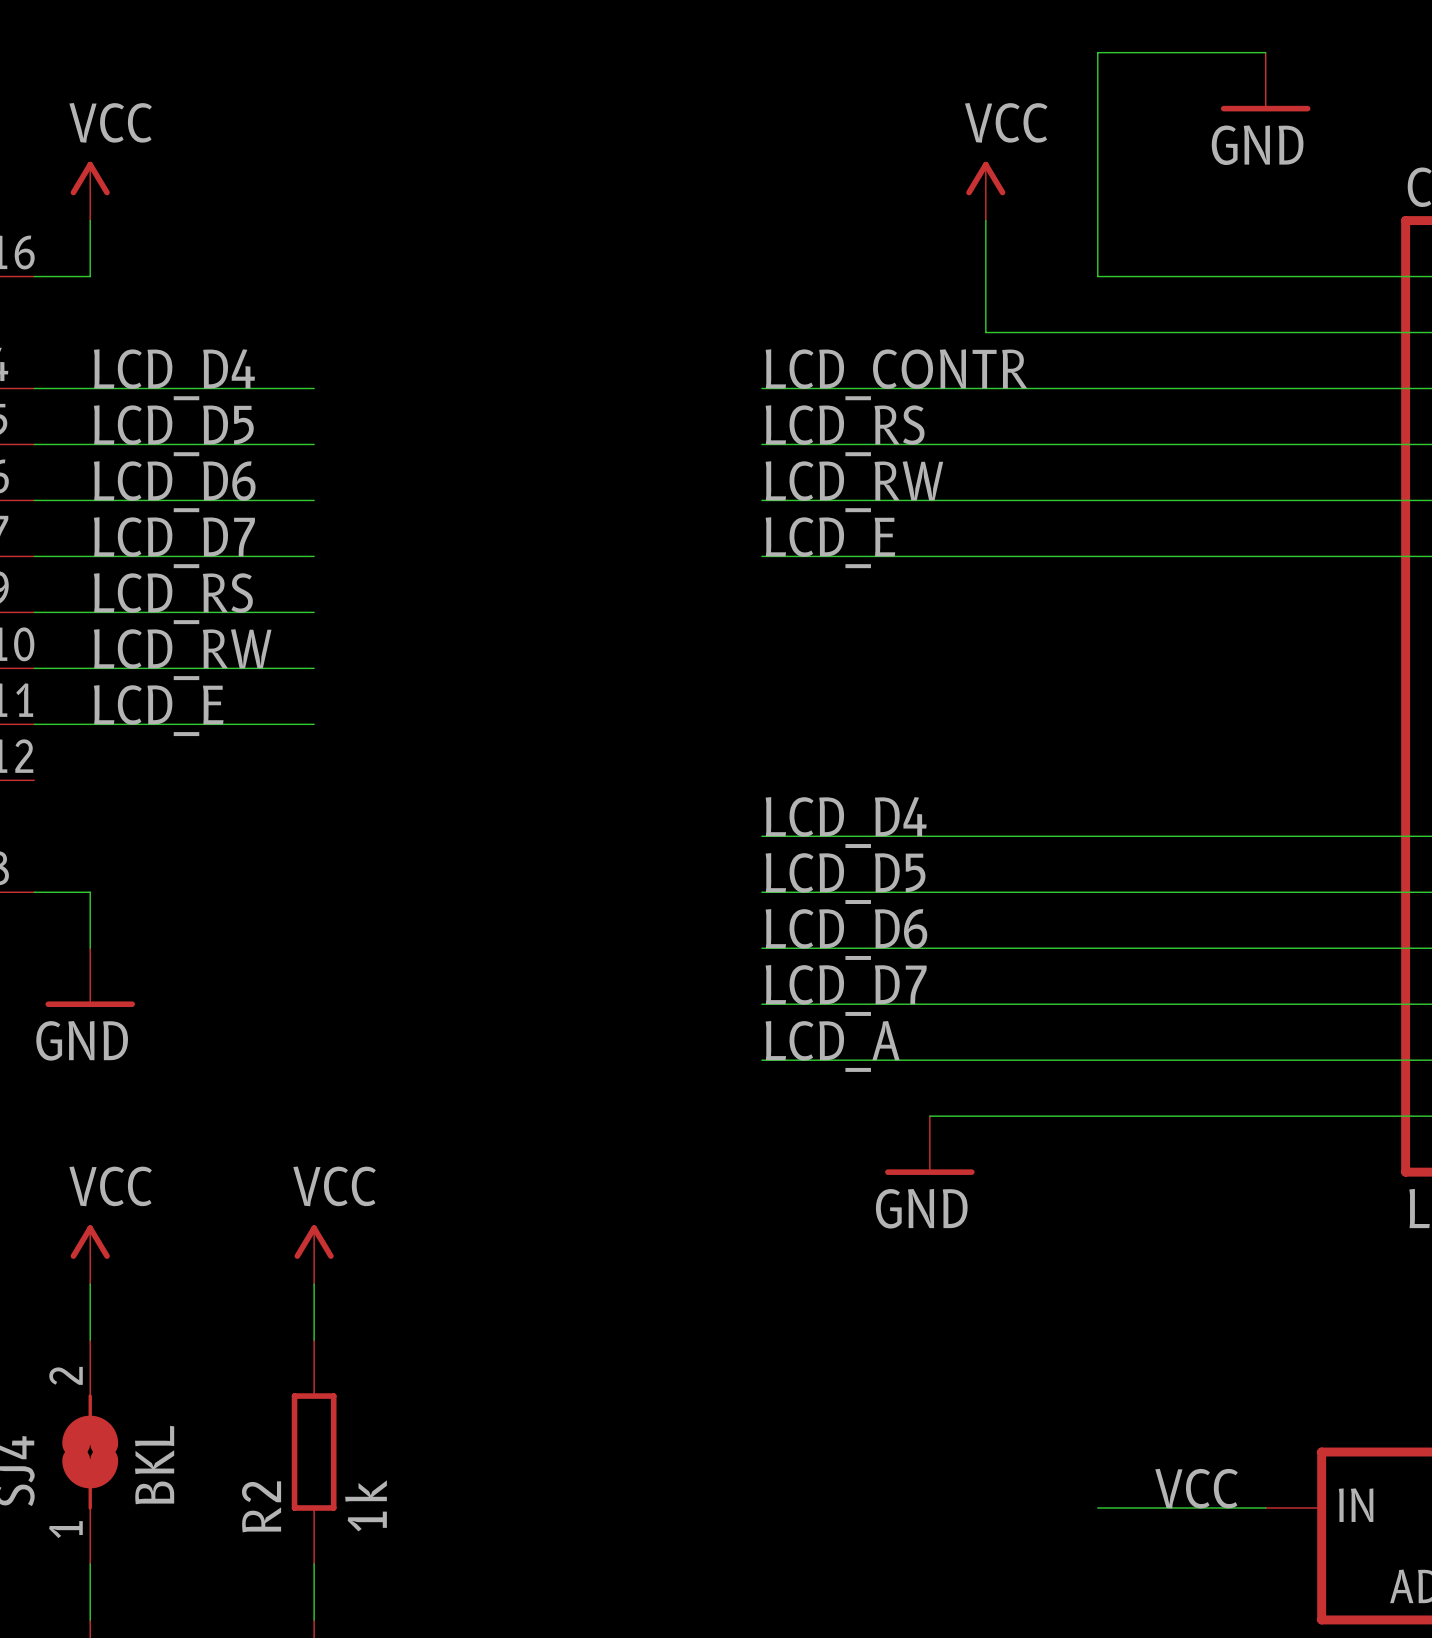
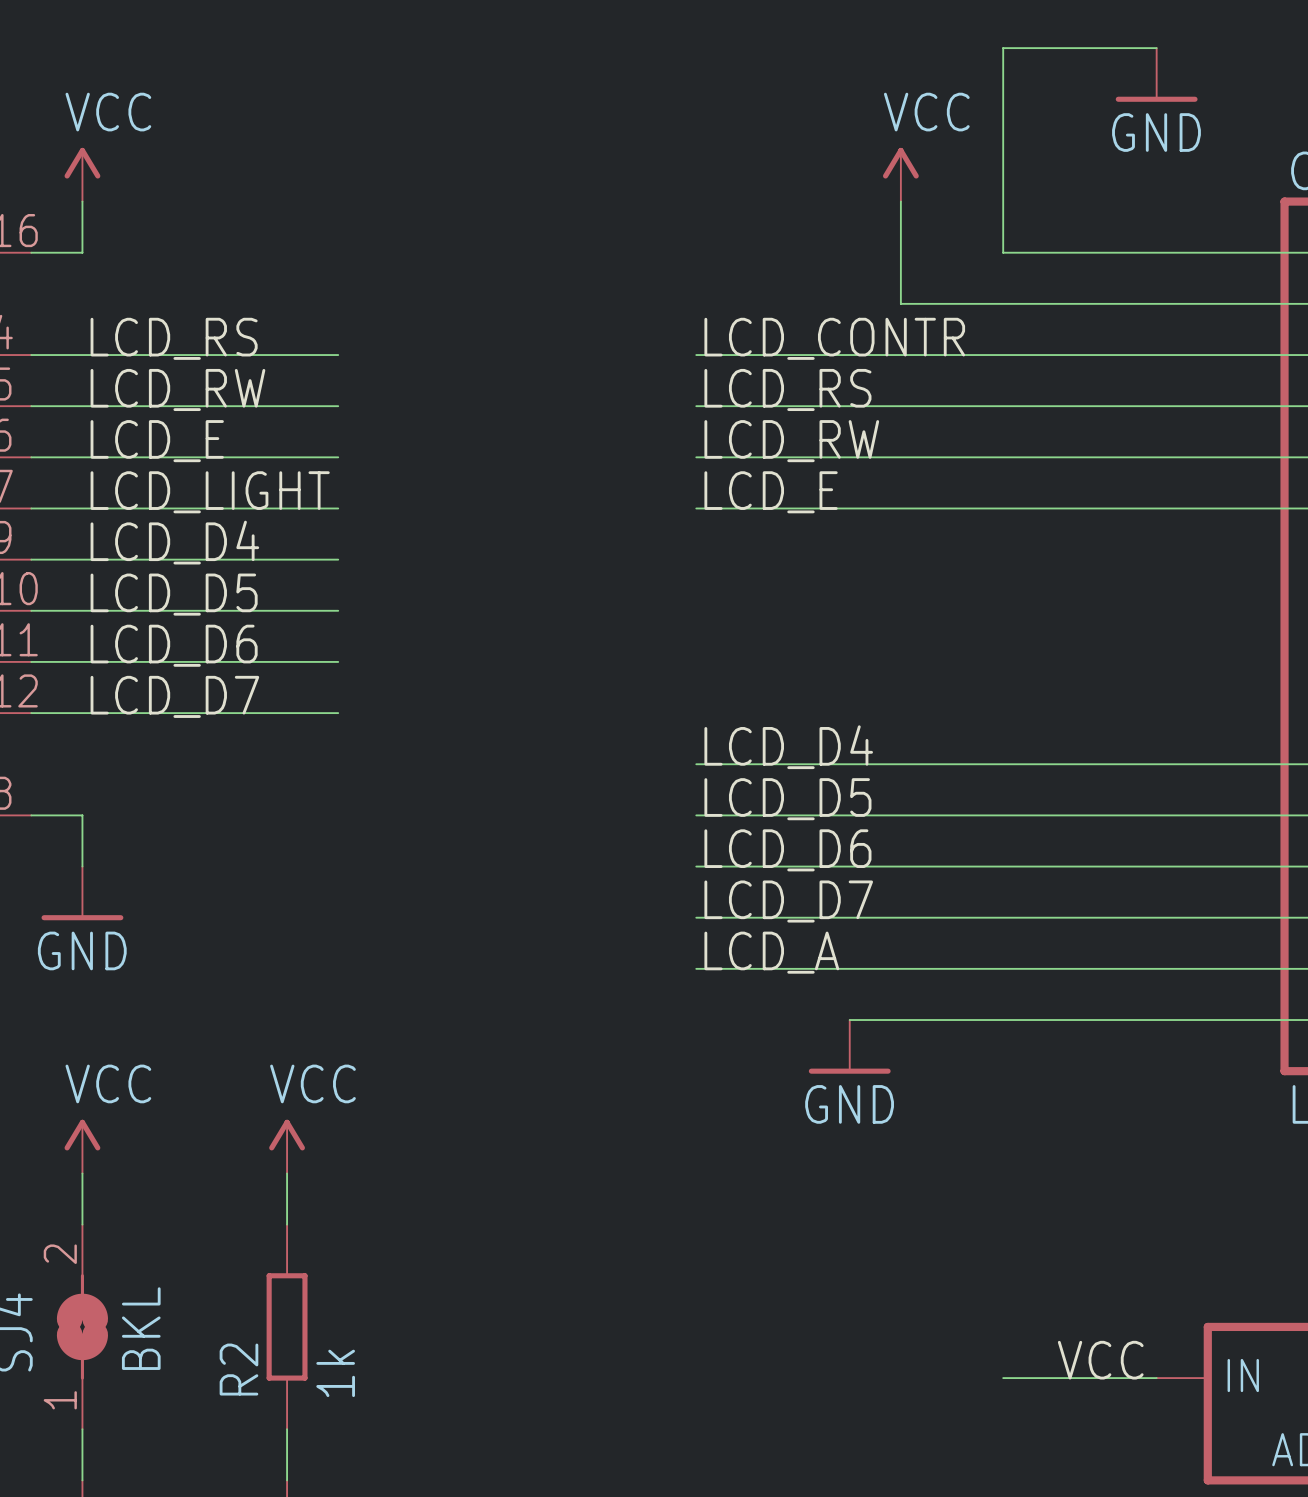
label: LCD_D4 (174, 374) -> LCD_RS (174, 338)
wire: none -> (287, 355) (338, 355)
label: LCD_D5 (173, 430) -> LCD_RW (177, 389)
wire: none -> (287, 406) (338, 406)
label: LCD_D6 (174, 486) -> LCD_E (157, 441)
wire: none -> (287, 457) (338, 457)
label: LCD_D7 (174, 542) -> LCD_LIGHT (210, 492)
wire: none -> (287, 508) (338, 508)
label: LCD_RS (173, 598) -> LCD_D4 (174, 542)
wire: none -> (287, 559) (338, 559)
label: LCD_RW (182, 654) -> LCD_D5 (174, 594)
wire: none -> (287, 610) (338, 610)
label: LCD_E (158, 710) -> LCD_D6 (174, 645)
wire: none -> (287, 661) (338, 661)
label: none -> LCD_D7 (174, 696)
wire: none -> (31, 713) (338, 713)

